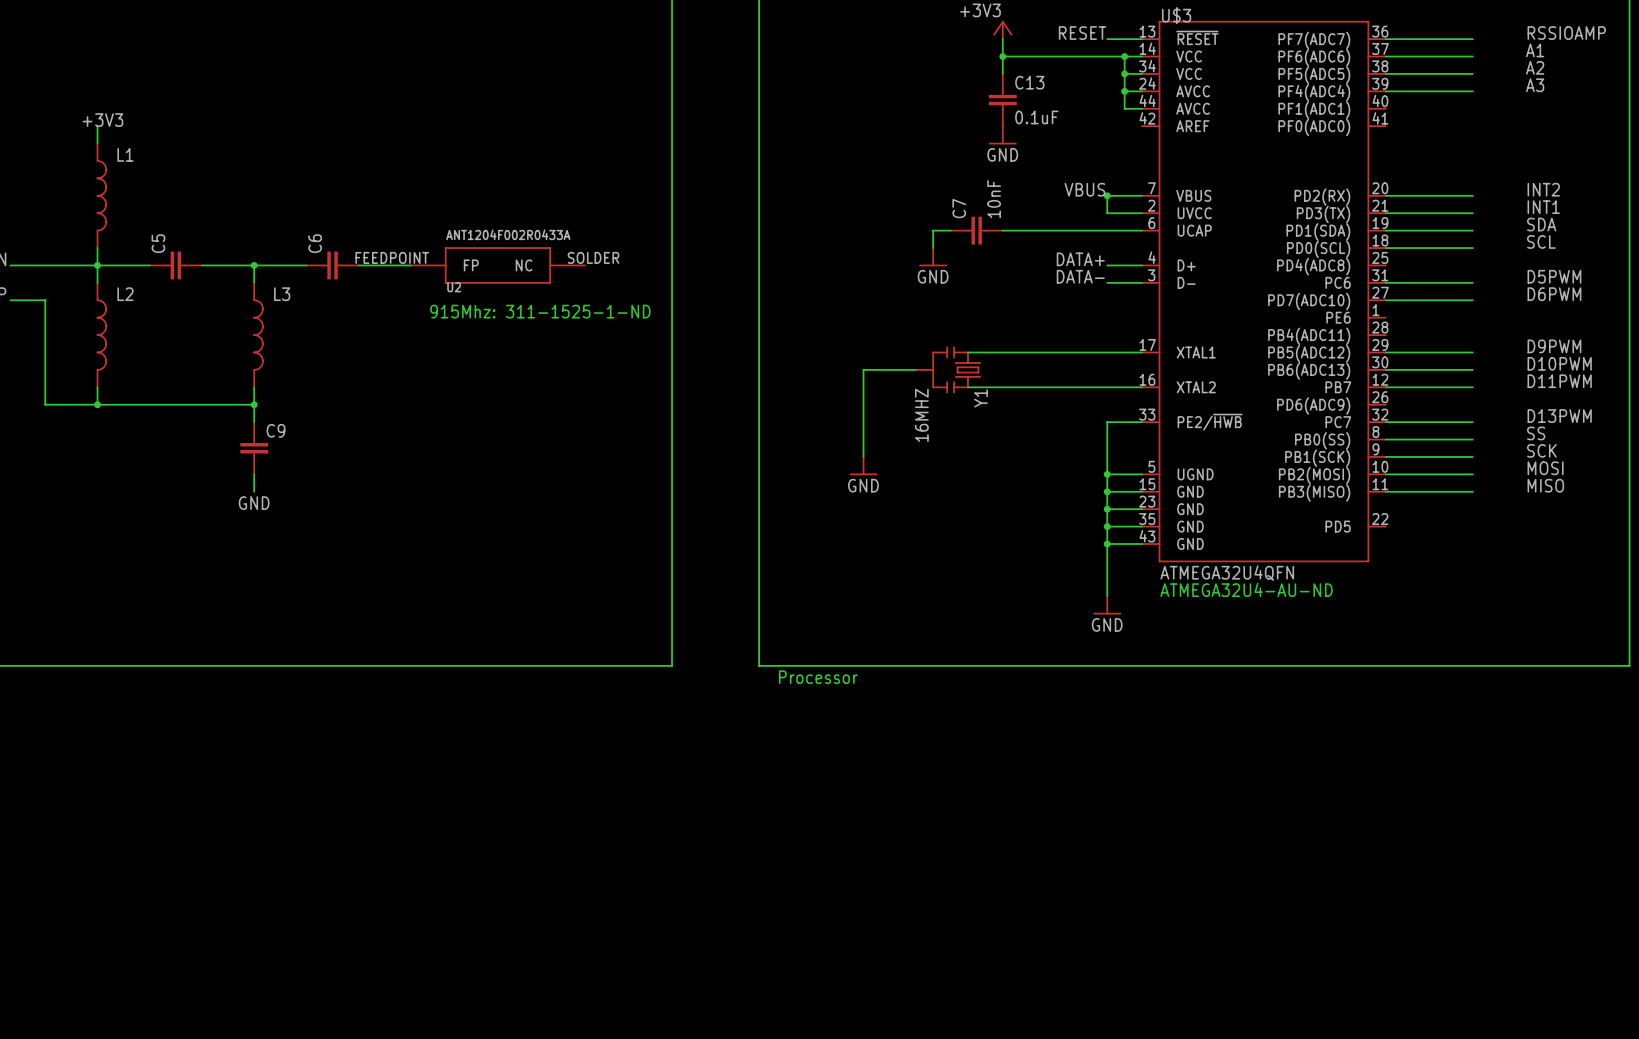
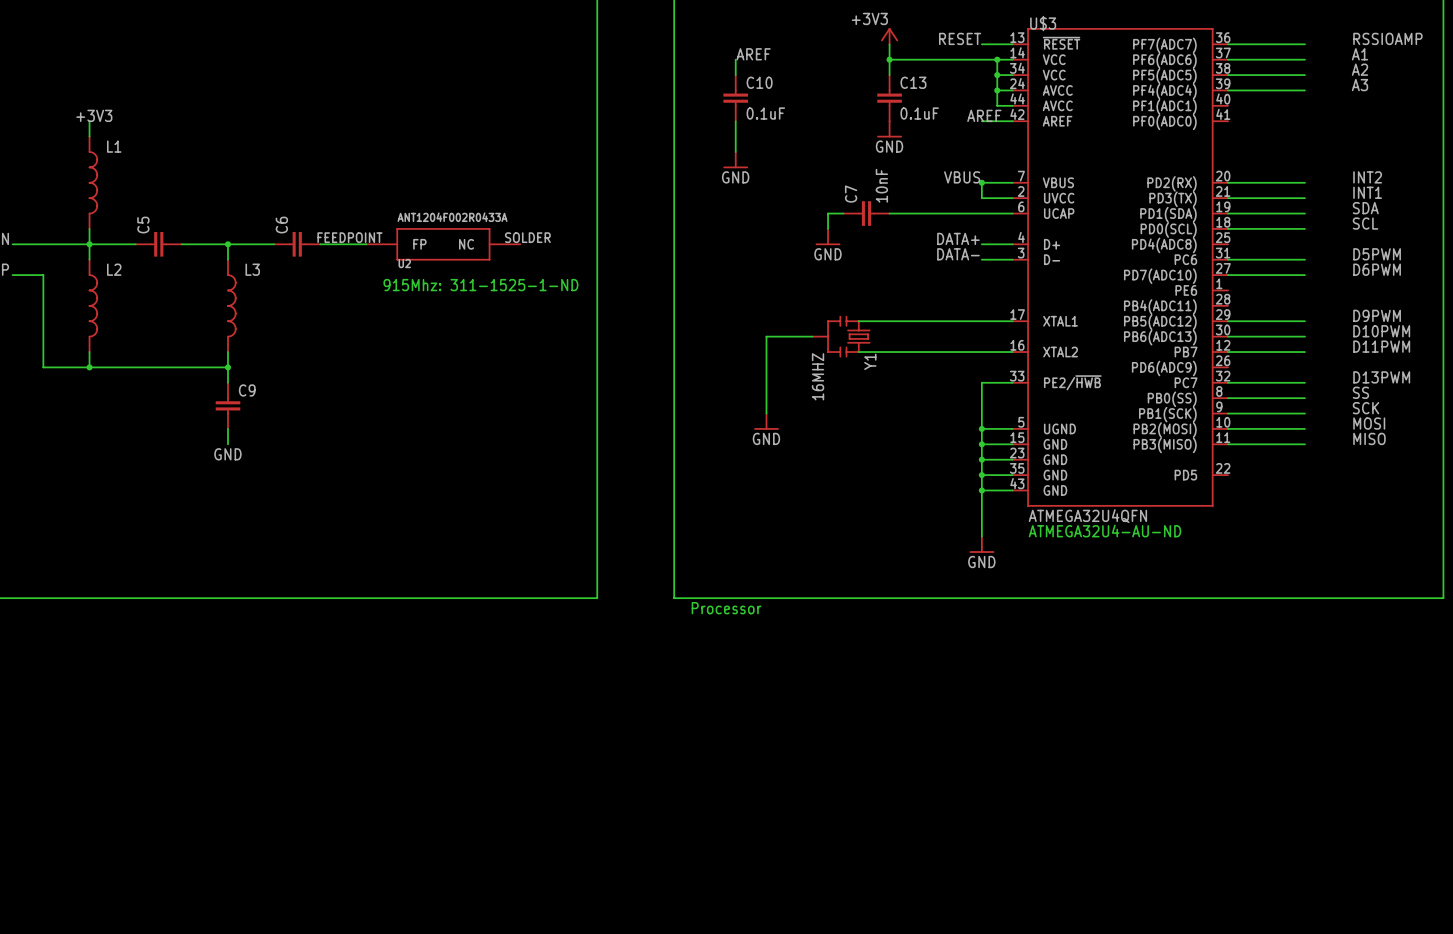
label: none -> AREF (753, 54)
wire: none -> (735, 59) (735, 75)
C10: none -> 0.1uF (735, 98)
label: none -> AREF (984, 115)
wire: none -> (735, 121) (735, 152)
wire: none -> (981, 121) (1012, 121)
power symbol: none -> GND (735, 160)

